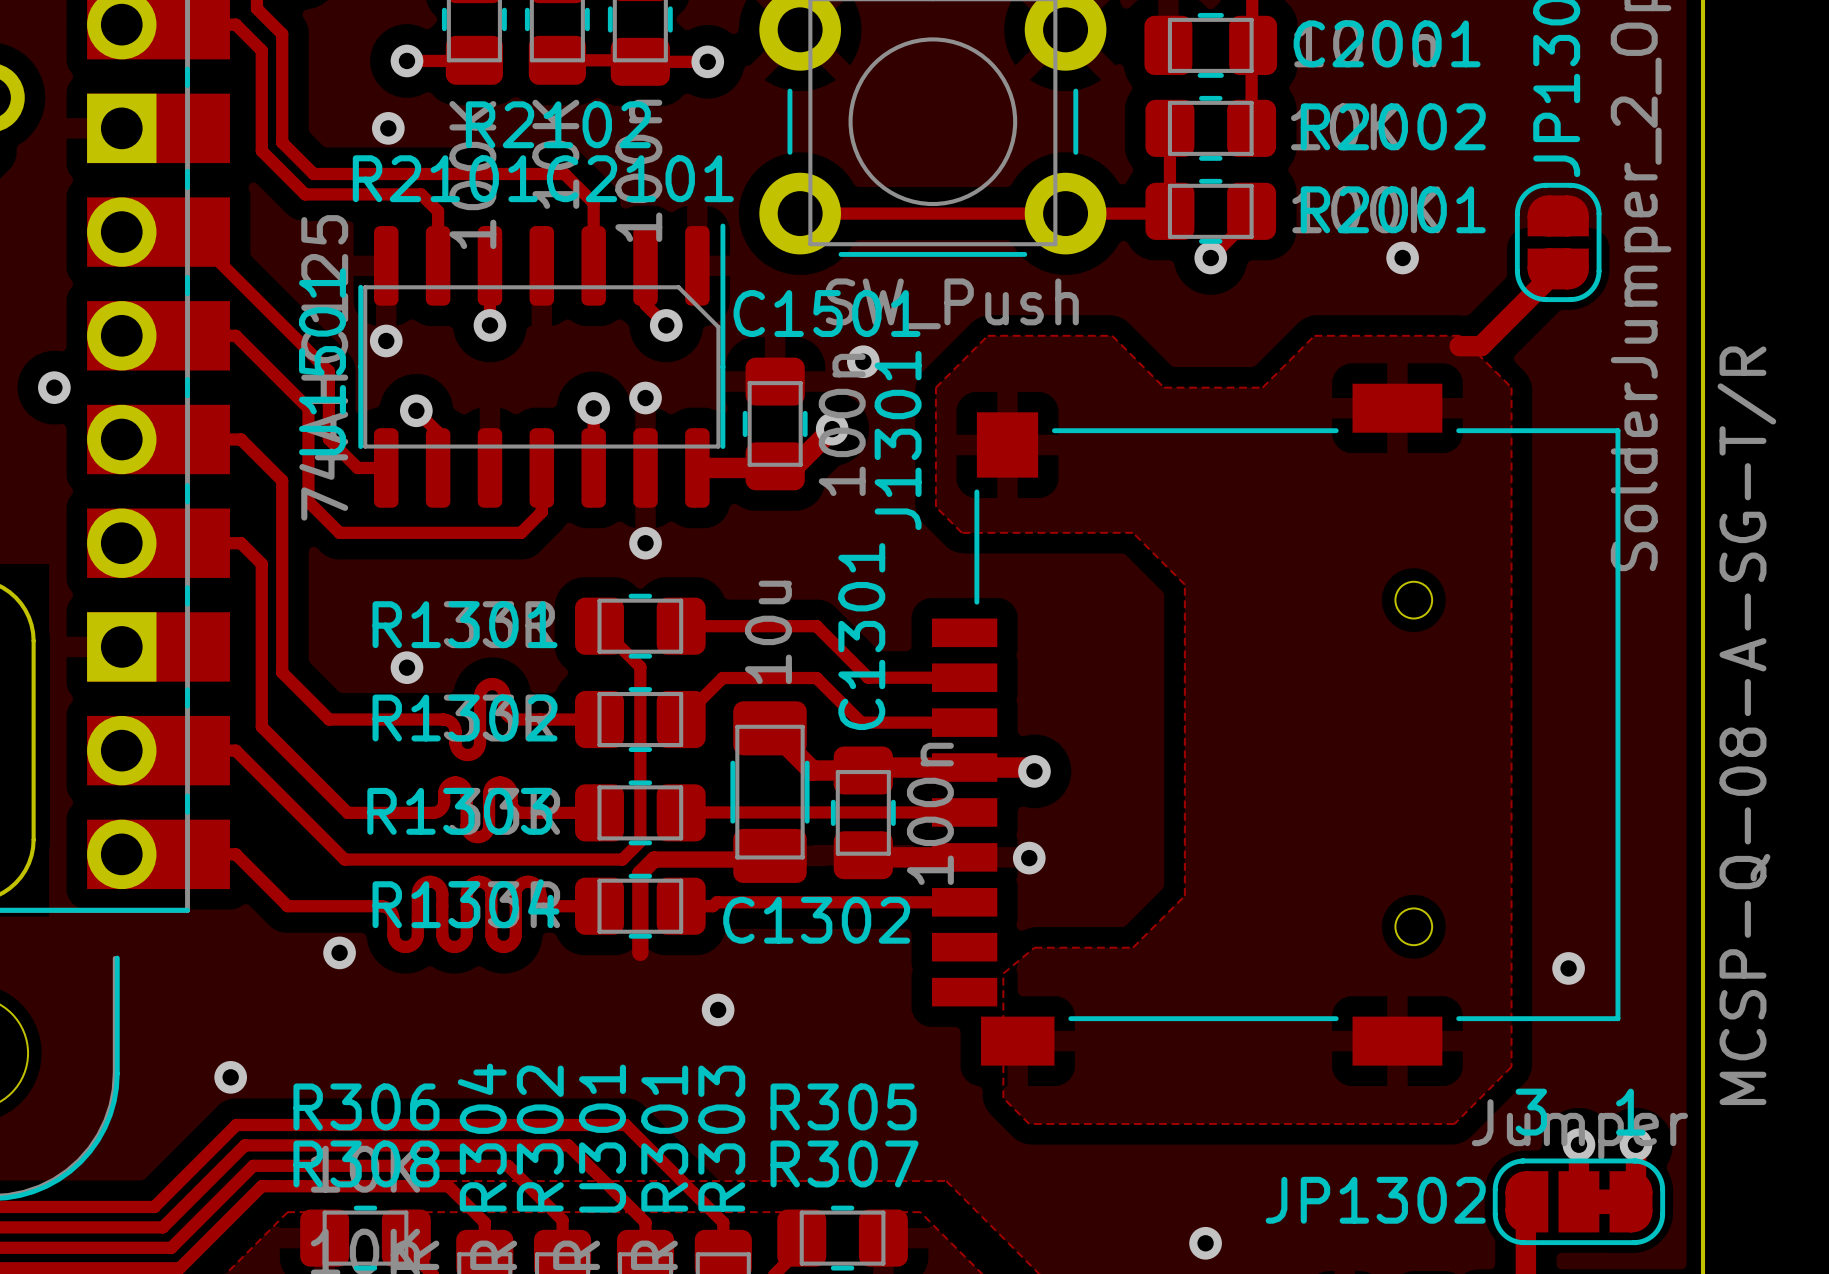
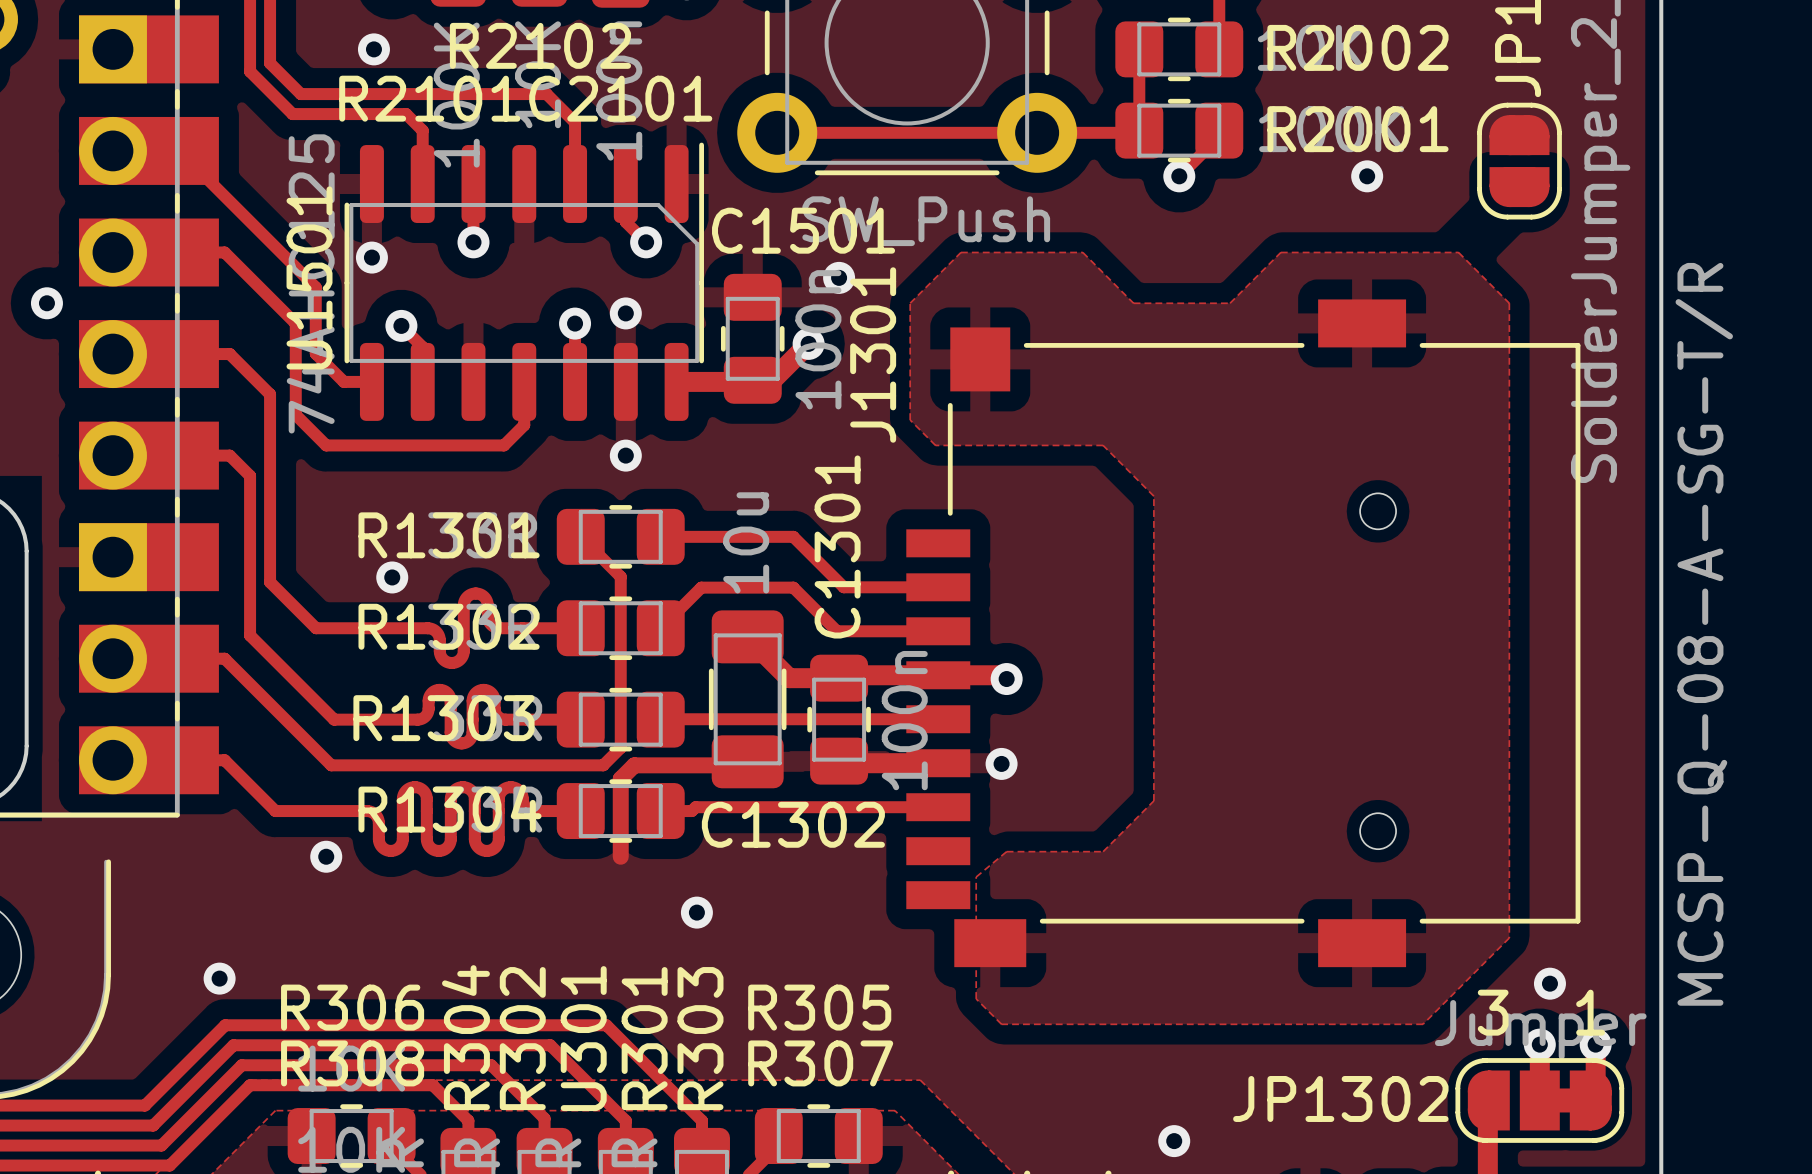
track: (1558, 268) (1481, 346) (1459, 346) -> none
zone outline: (1459, 335) (1511, 387) (1511, 1066) (1454, 1123) (1029, 1124) -> (1423, 252) (1458, 252) (1509, 303) (1509, 937) (1423, 1024) (1001, 1024)
via position: (1568, 968) -> (1549, 983)

